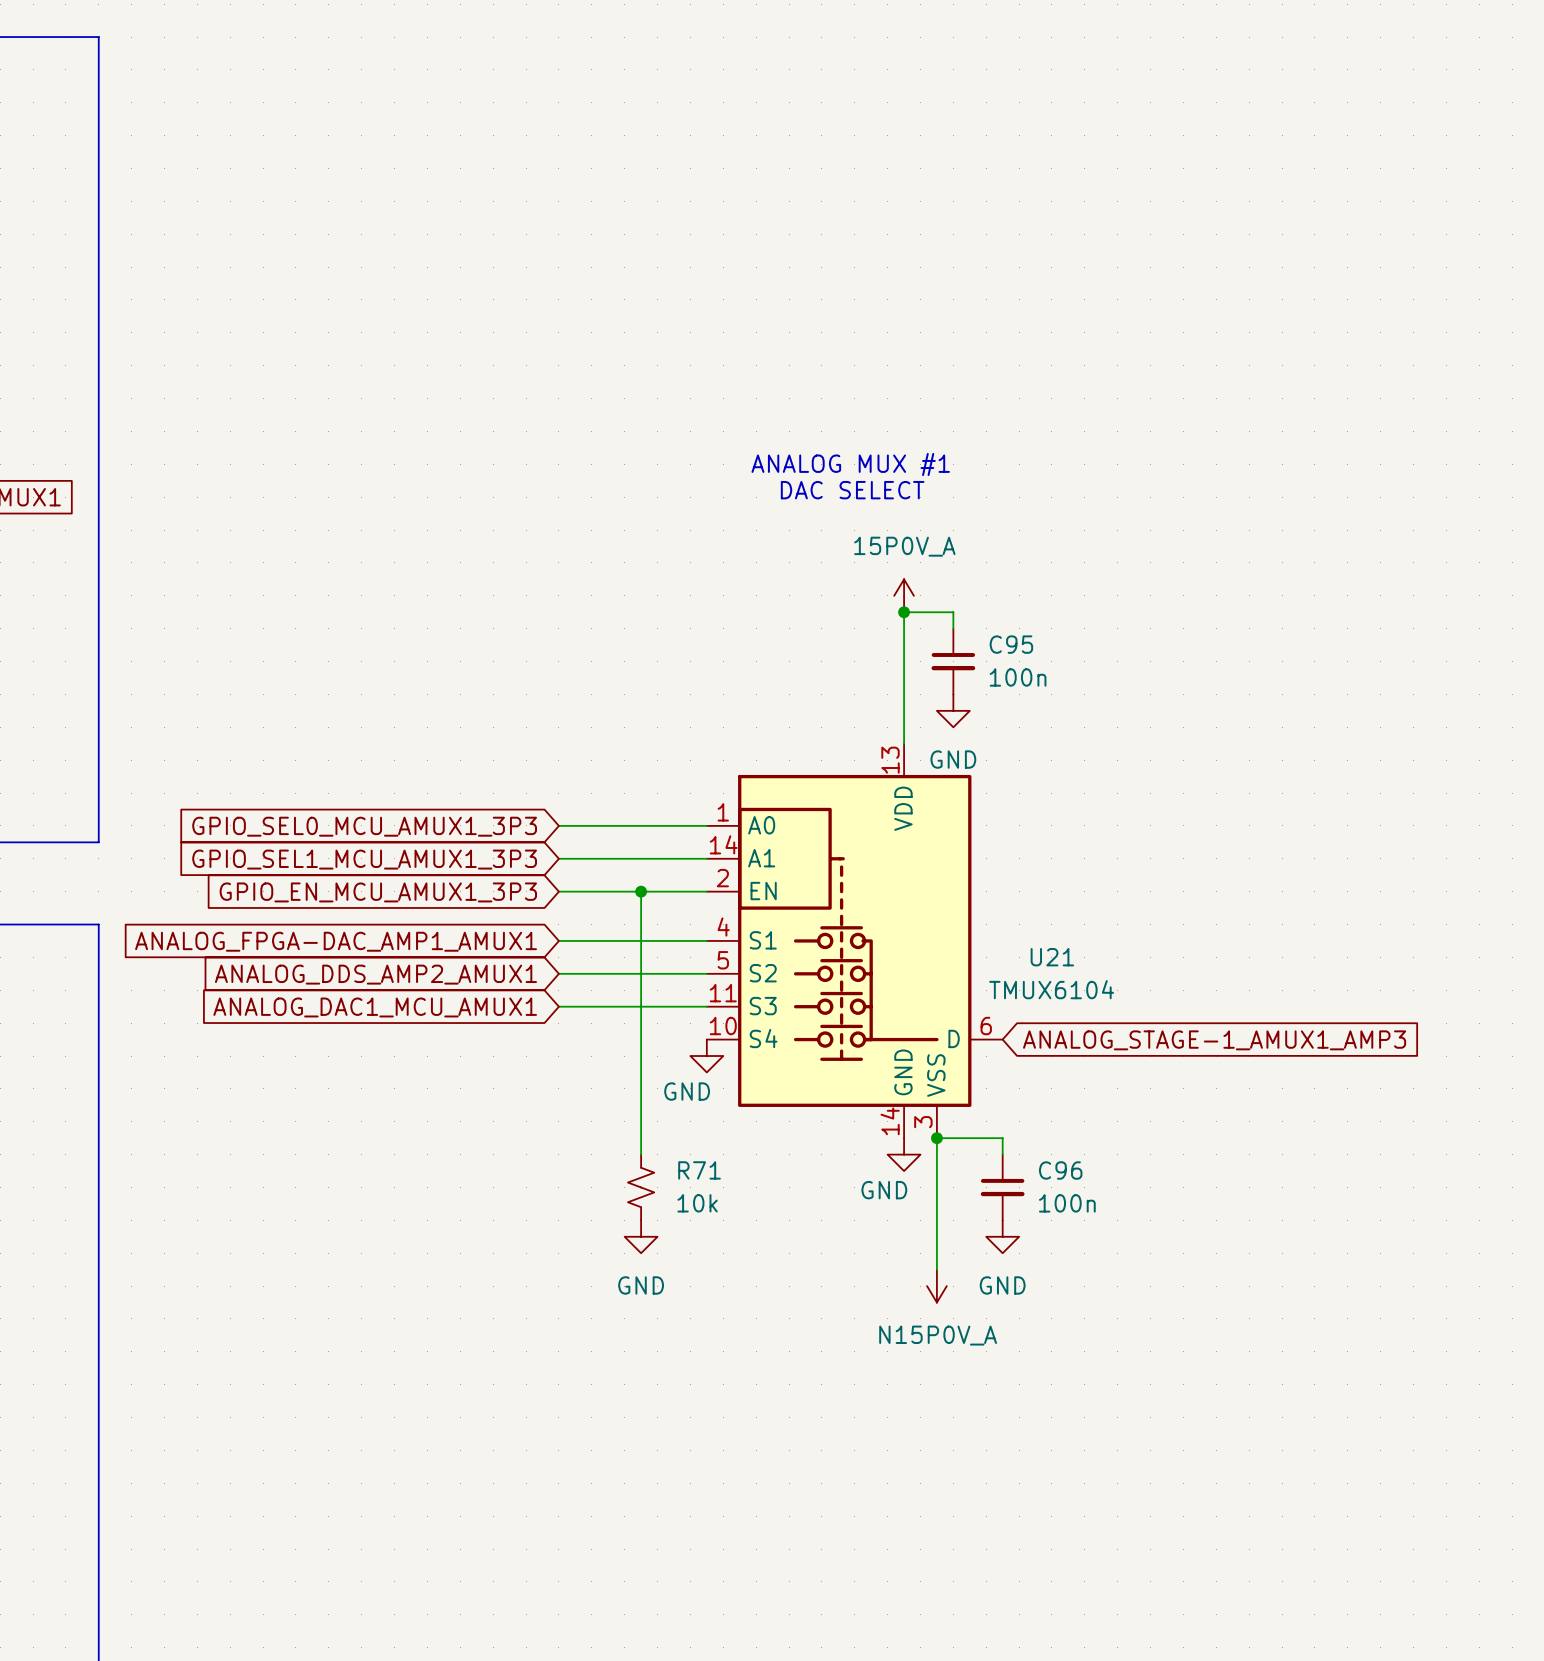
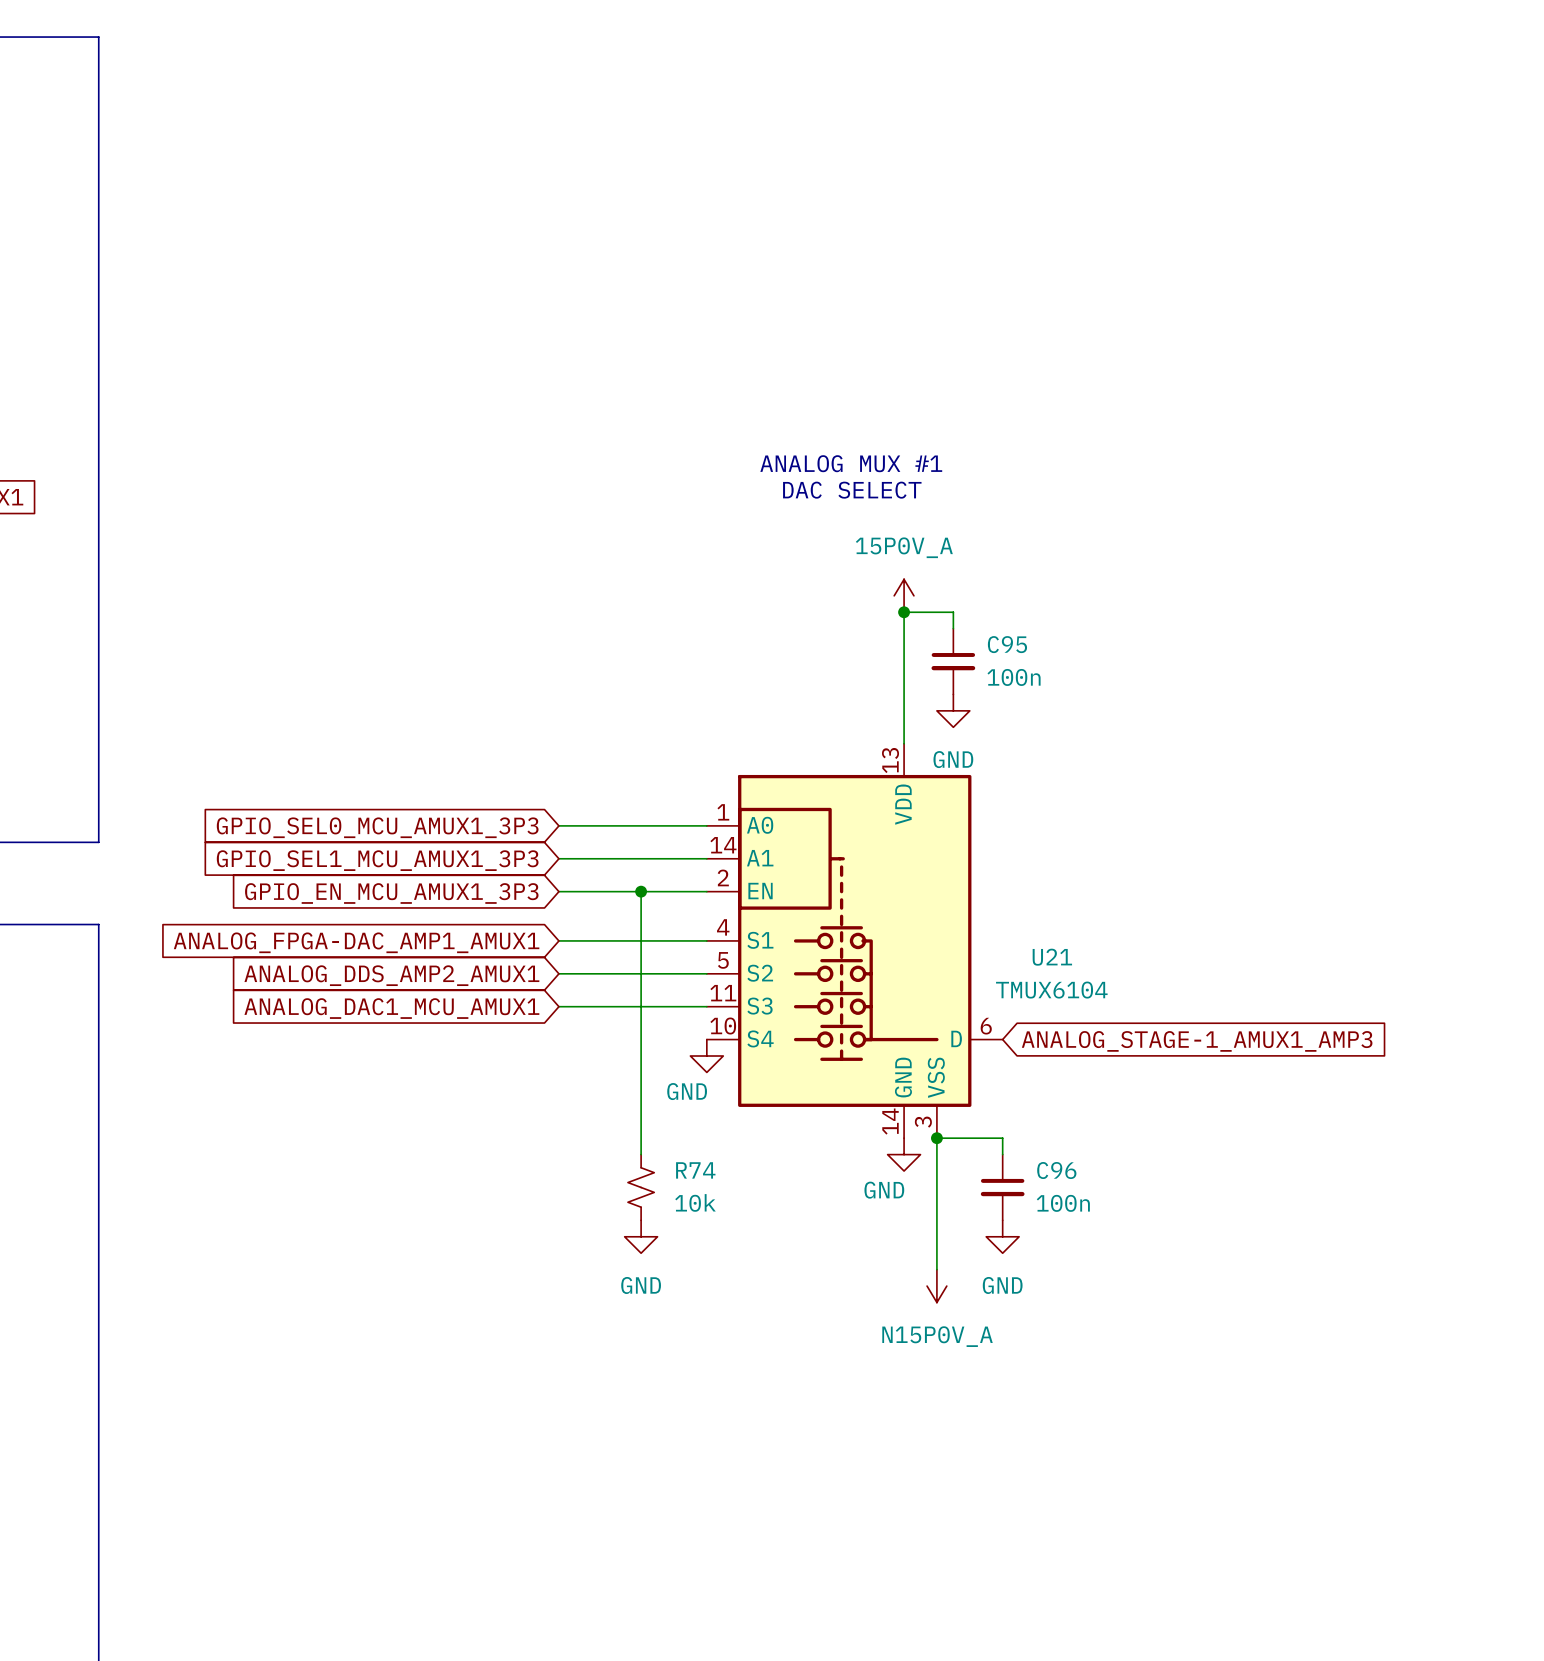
R71 name: R71 (699, 1170) -> R74 (695, 1170)

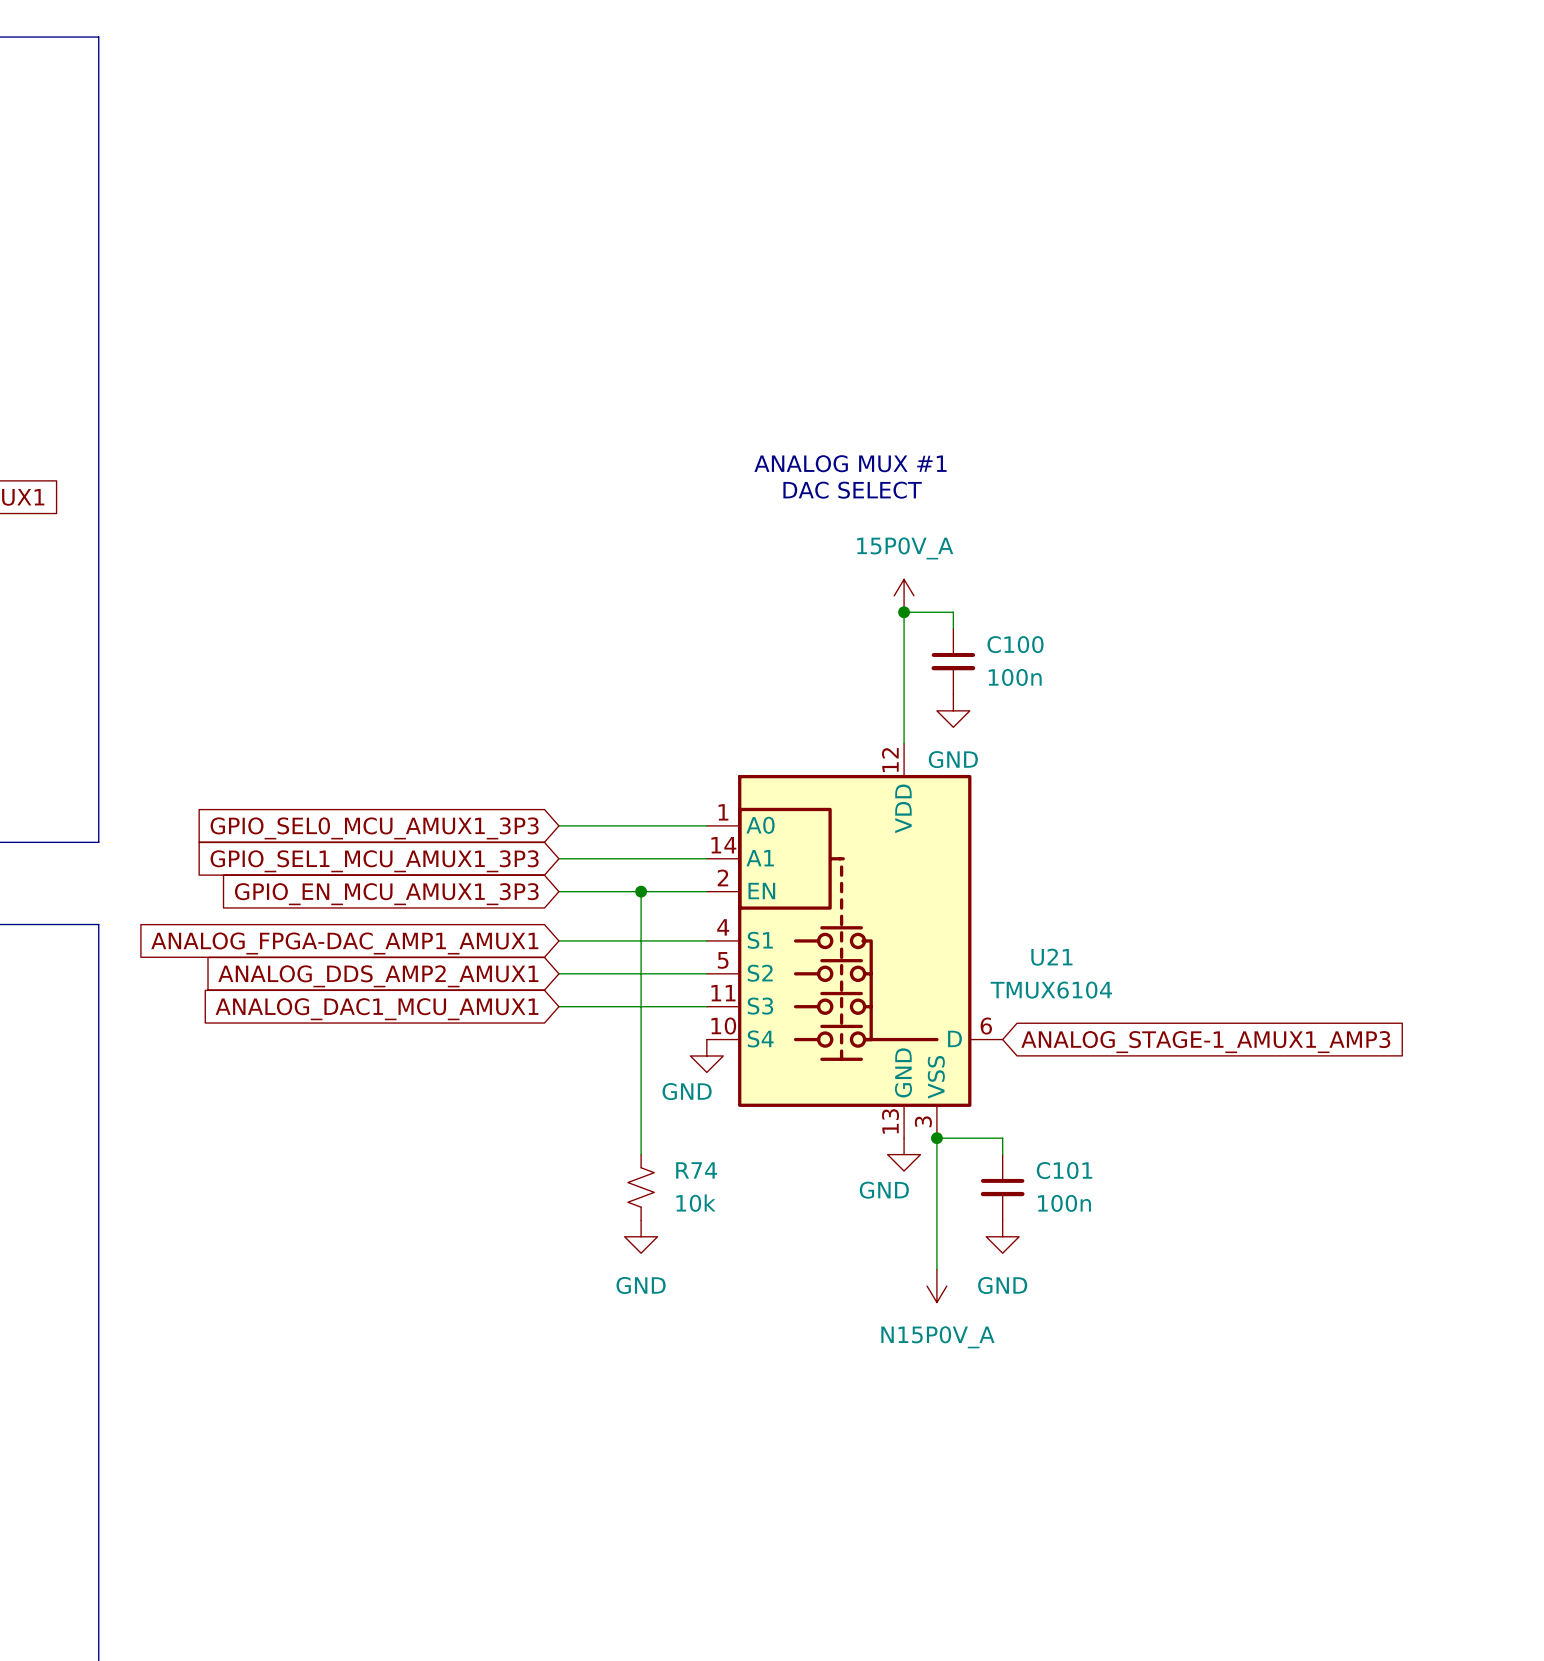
C95 name: C95 (1007, 644) -> C100 (1015, 644)
U21 pin number: 13 (890, 760) -> 12 (890, 760)
U21 pin number: 14 (890, 1121) -> 13 (890, 1121)
C96 name: C96 (1056, 1170) -> C101 (1064, 1170)

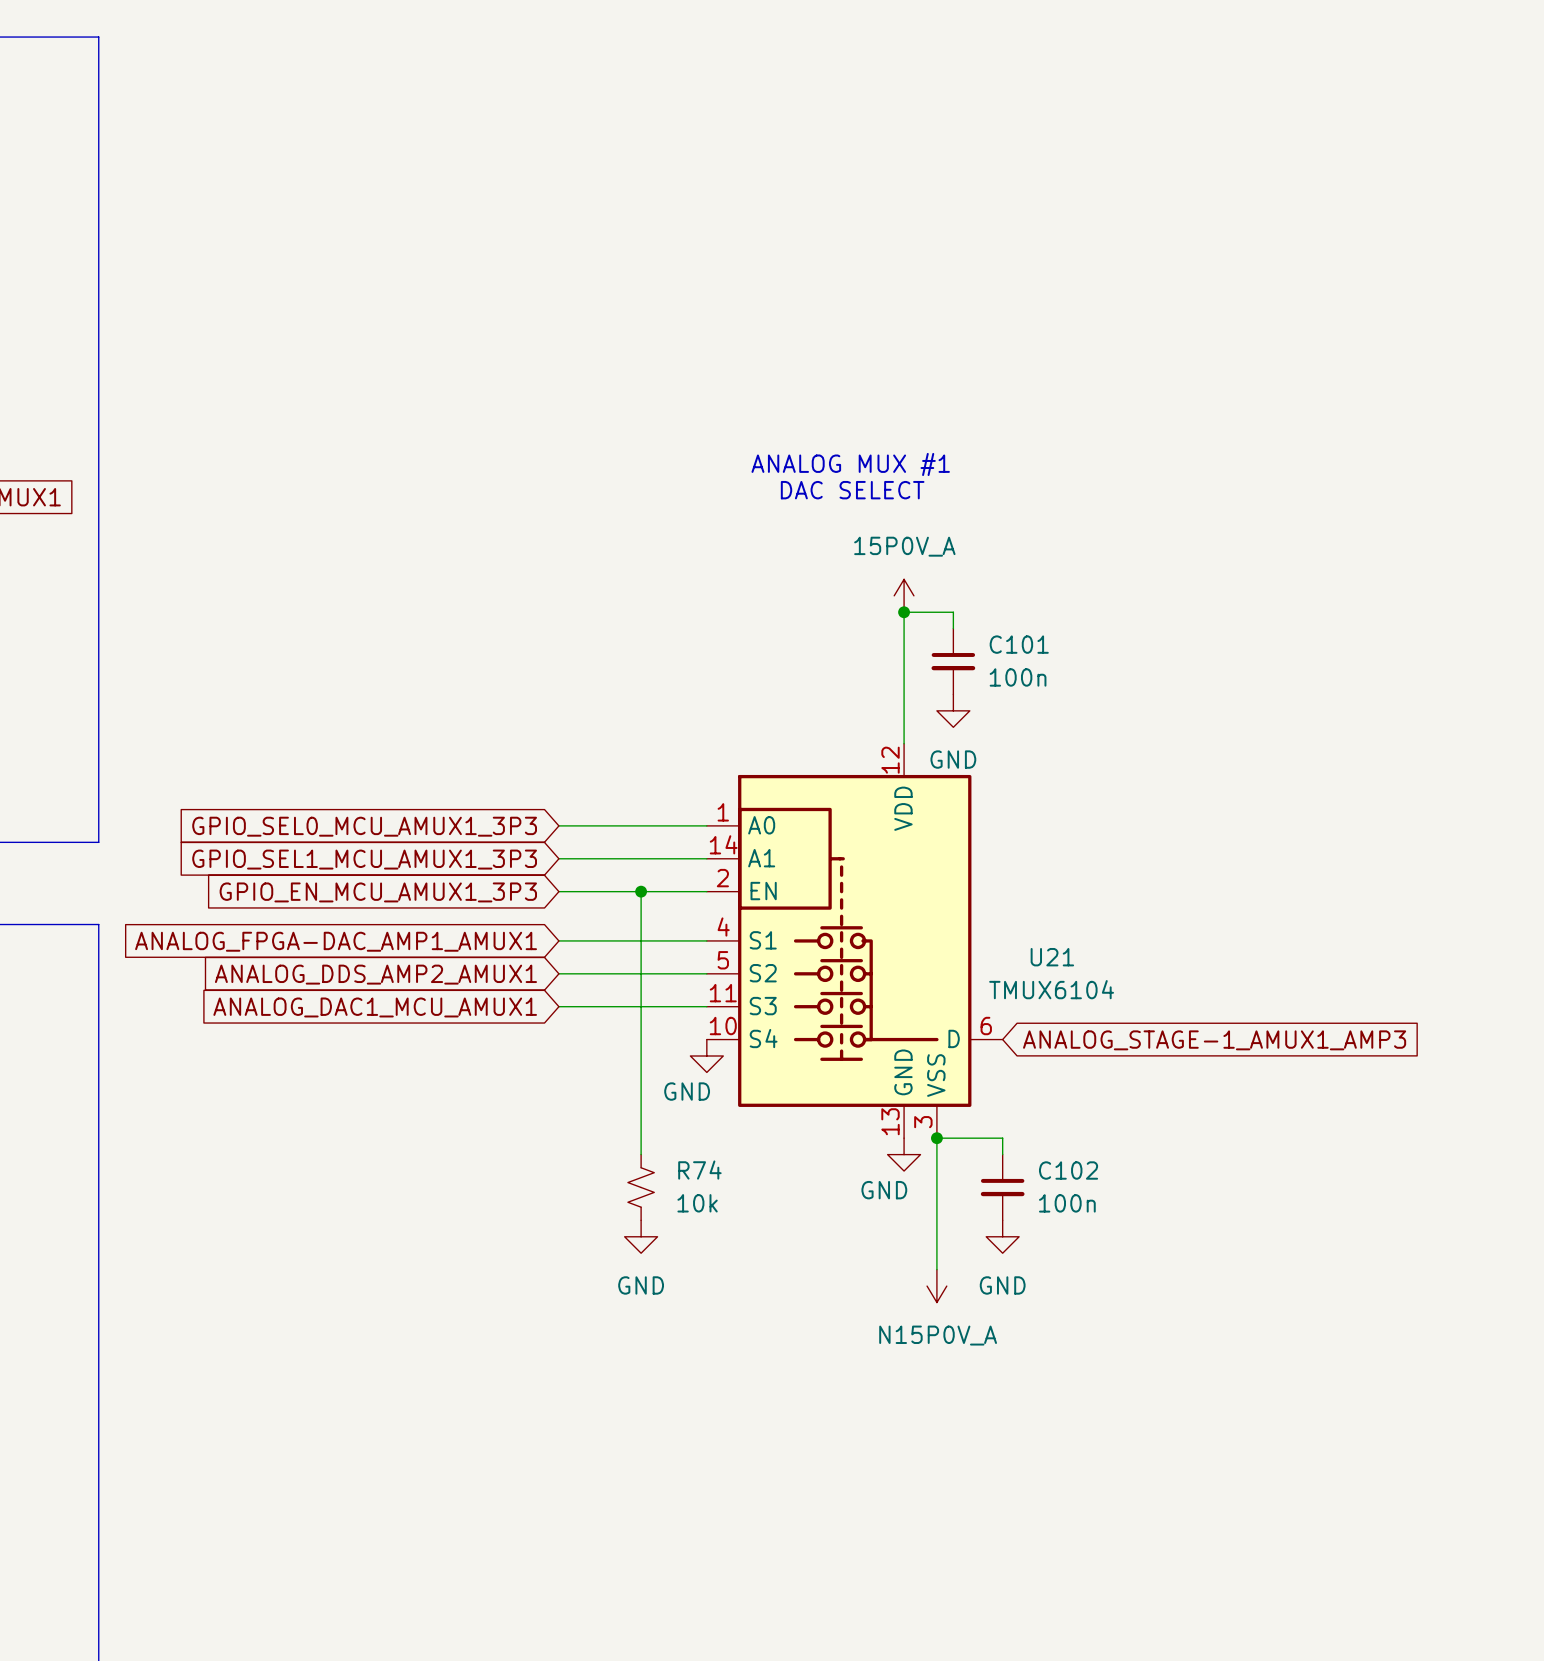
C100 name: C100 (1015, 644) -> C101 (1019, 644)
C101 name: C101 (1064, 1170) -> C102 (1068, 1170)

